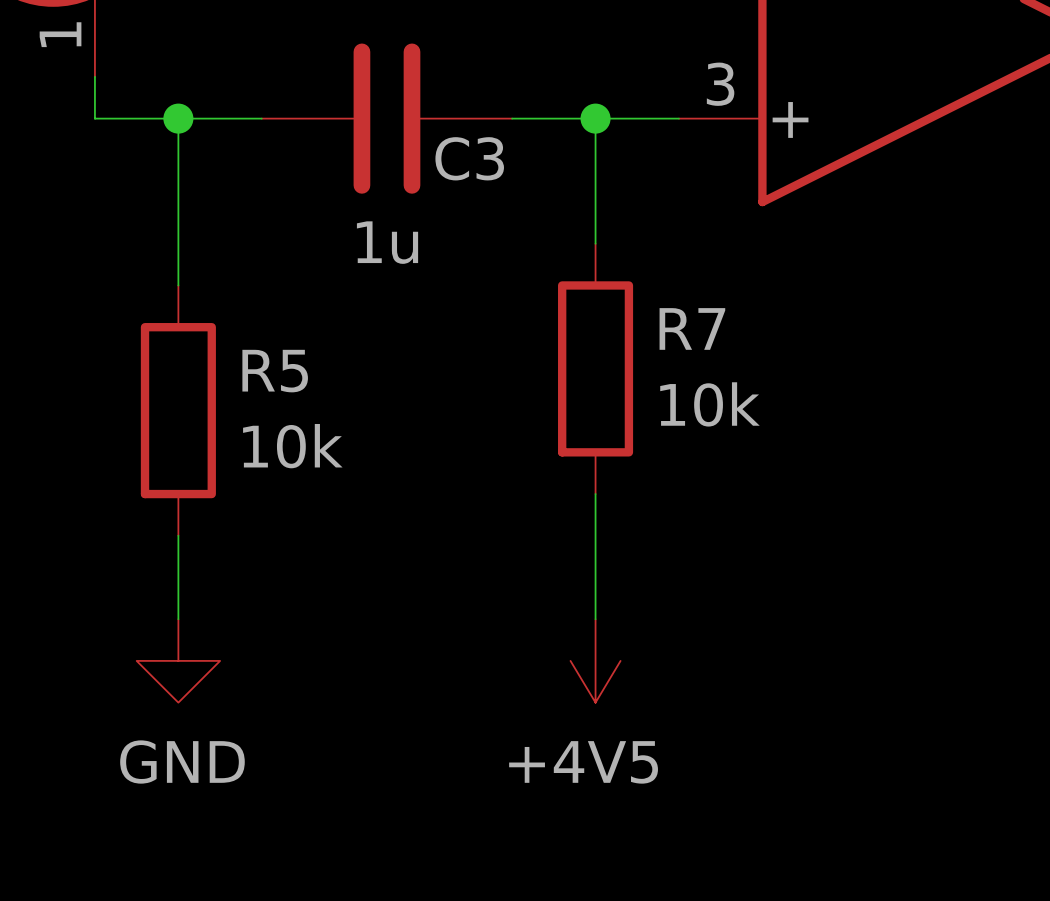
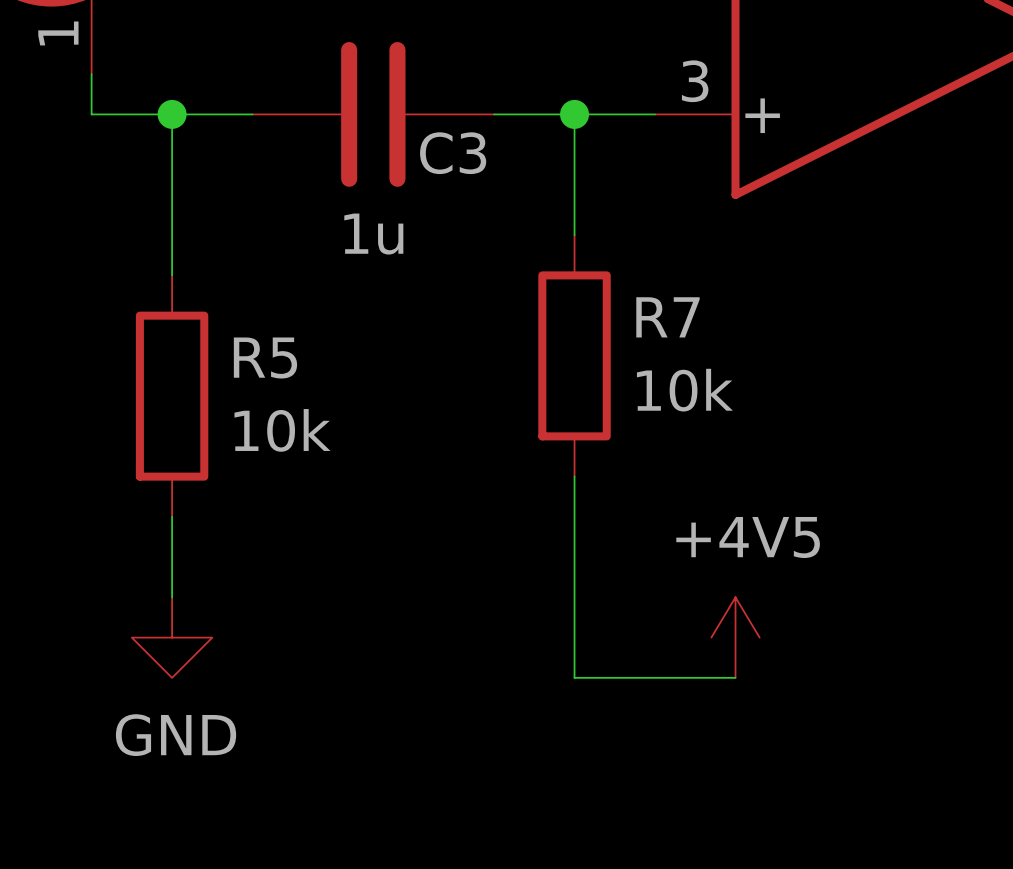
wire: none -> (574, 597) (574, 677) (735, 677)
power symbol rotation: 0° (595, 660) -> 180° (735, 637)
power symbol position: +4V5 (595, 660) -> +4V5 (735, 637)

